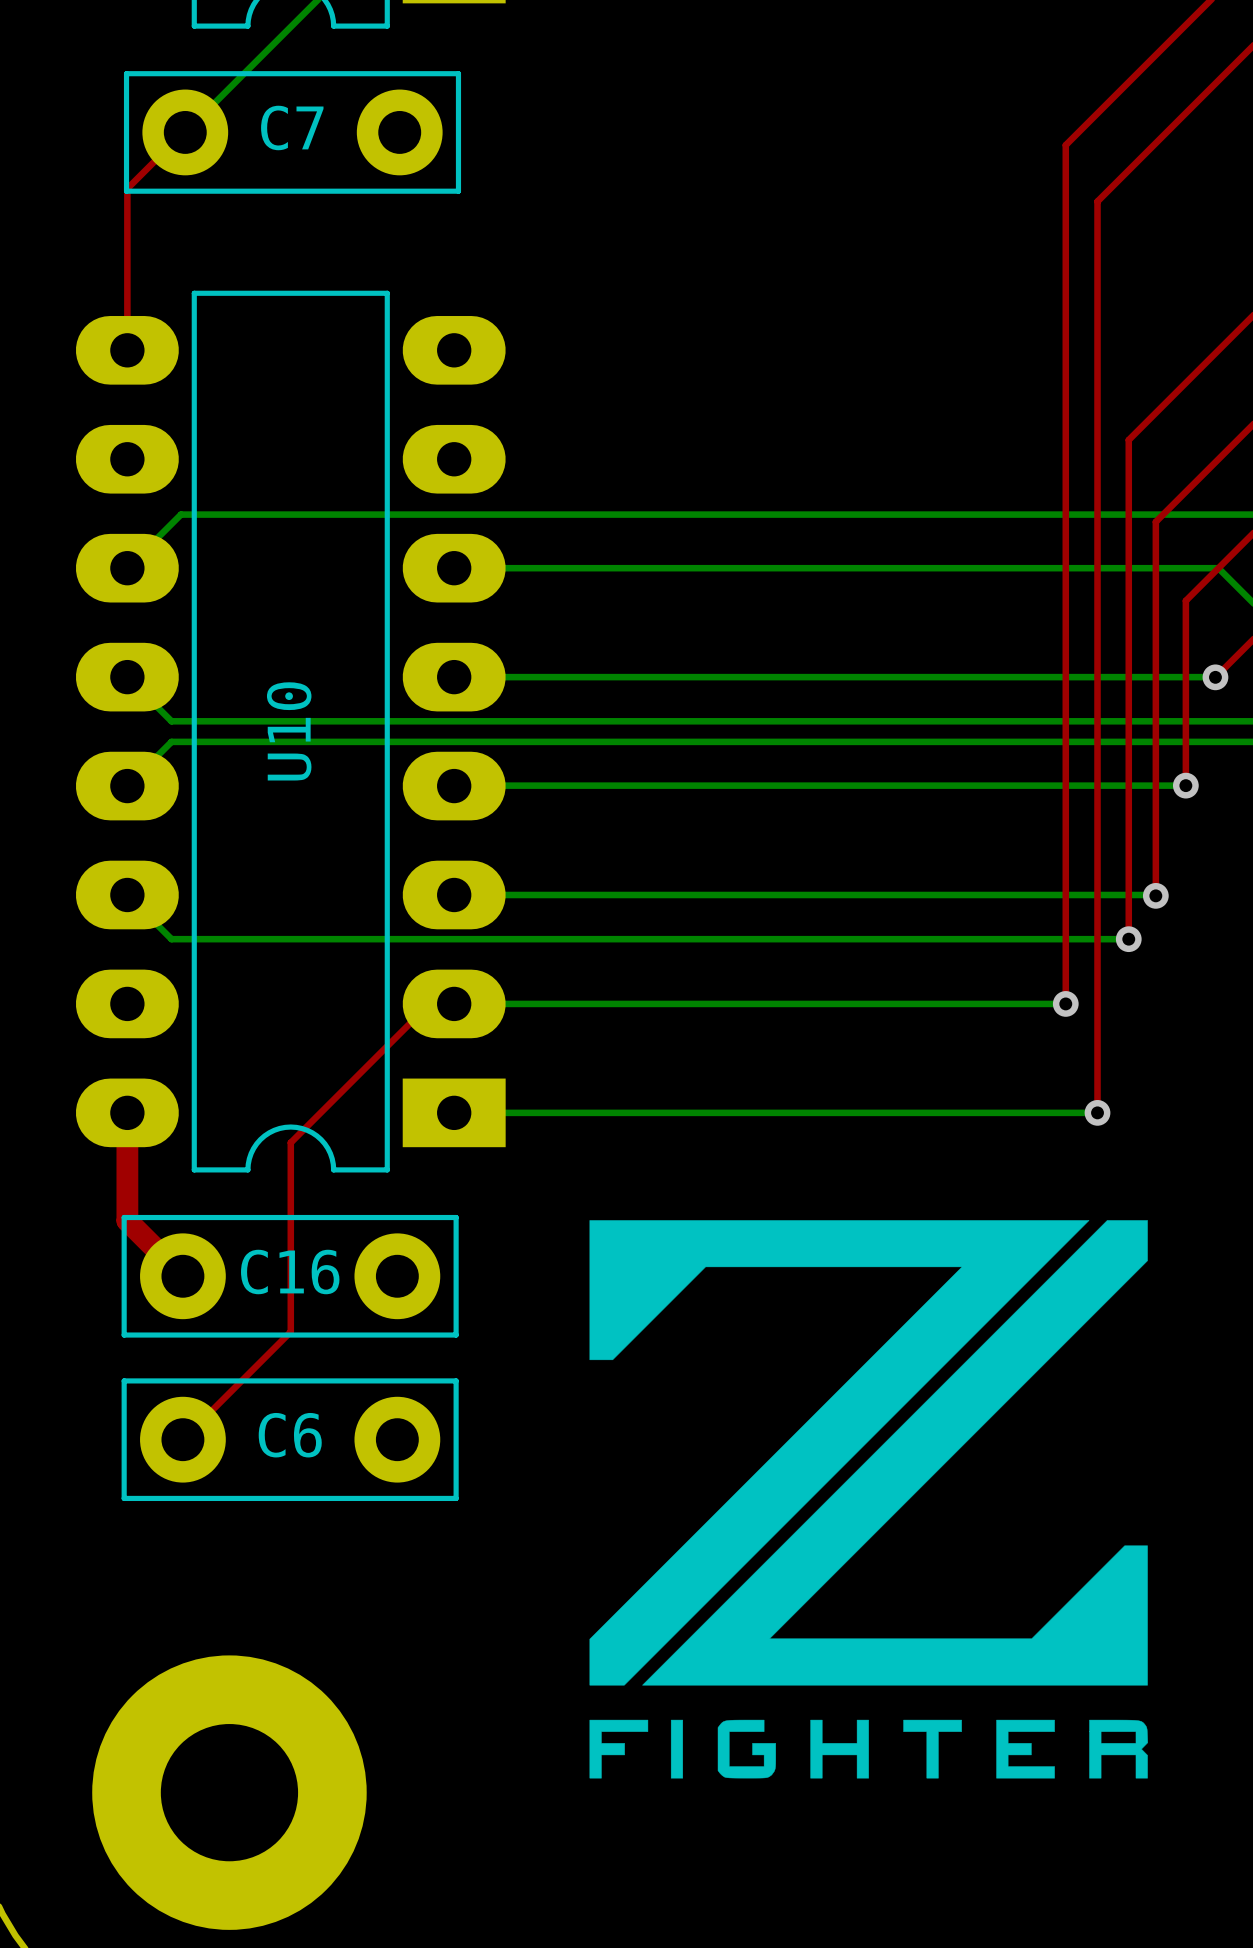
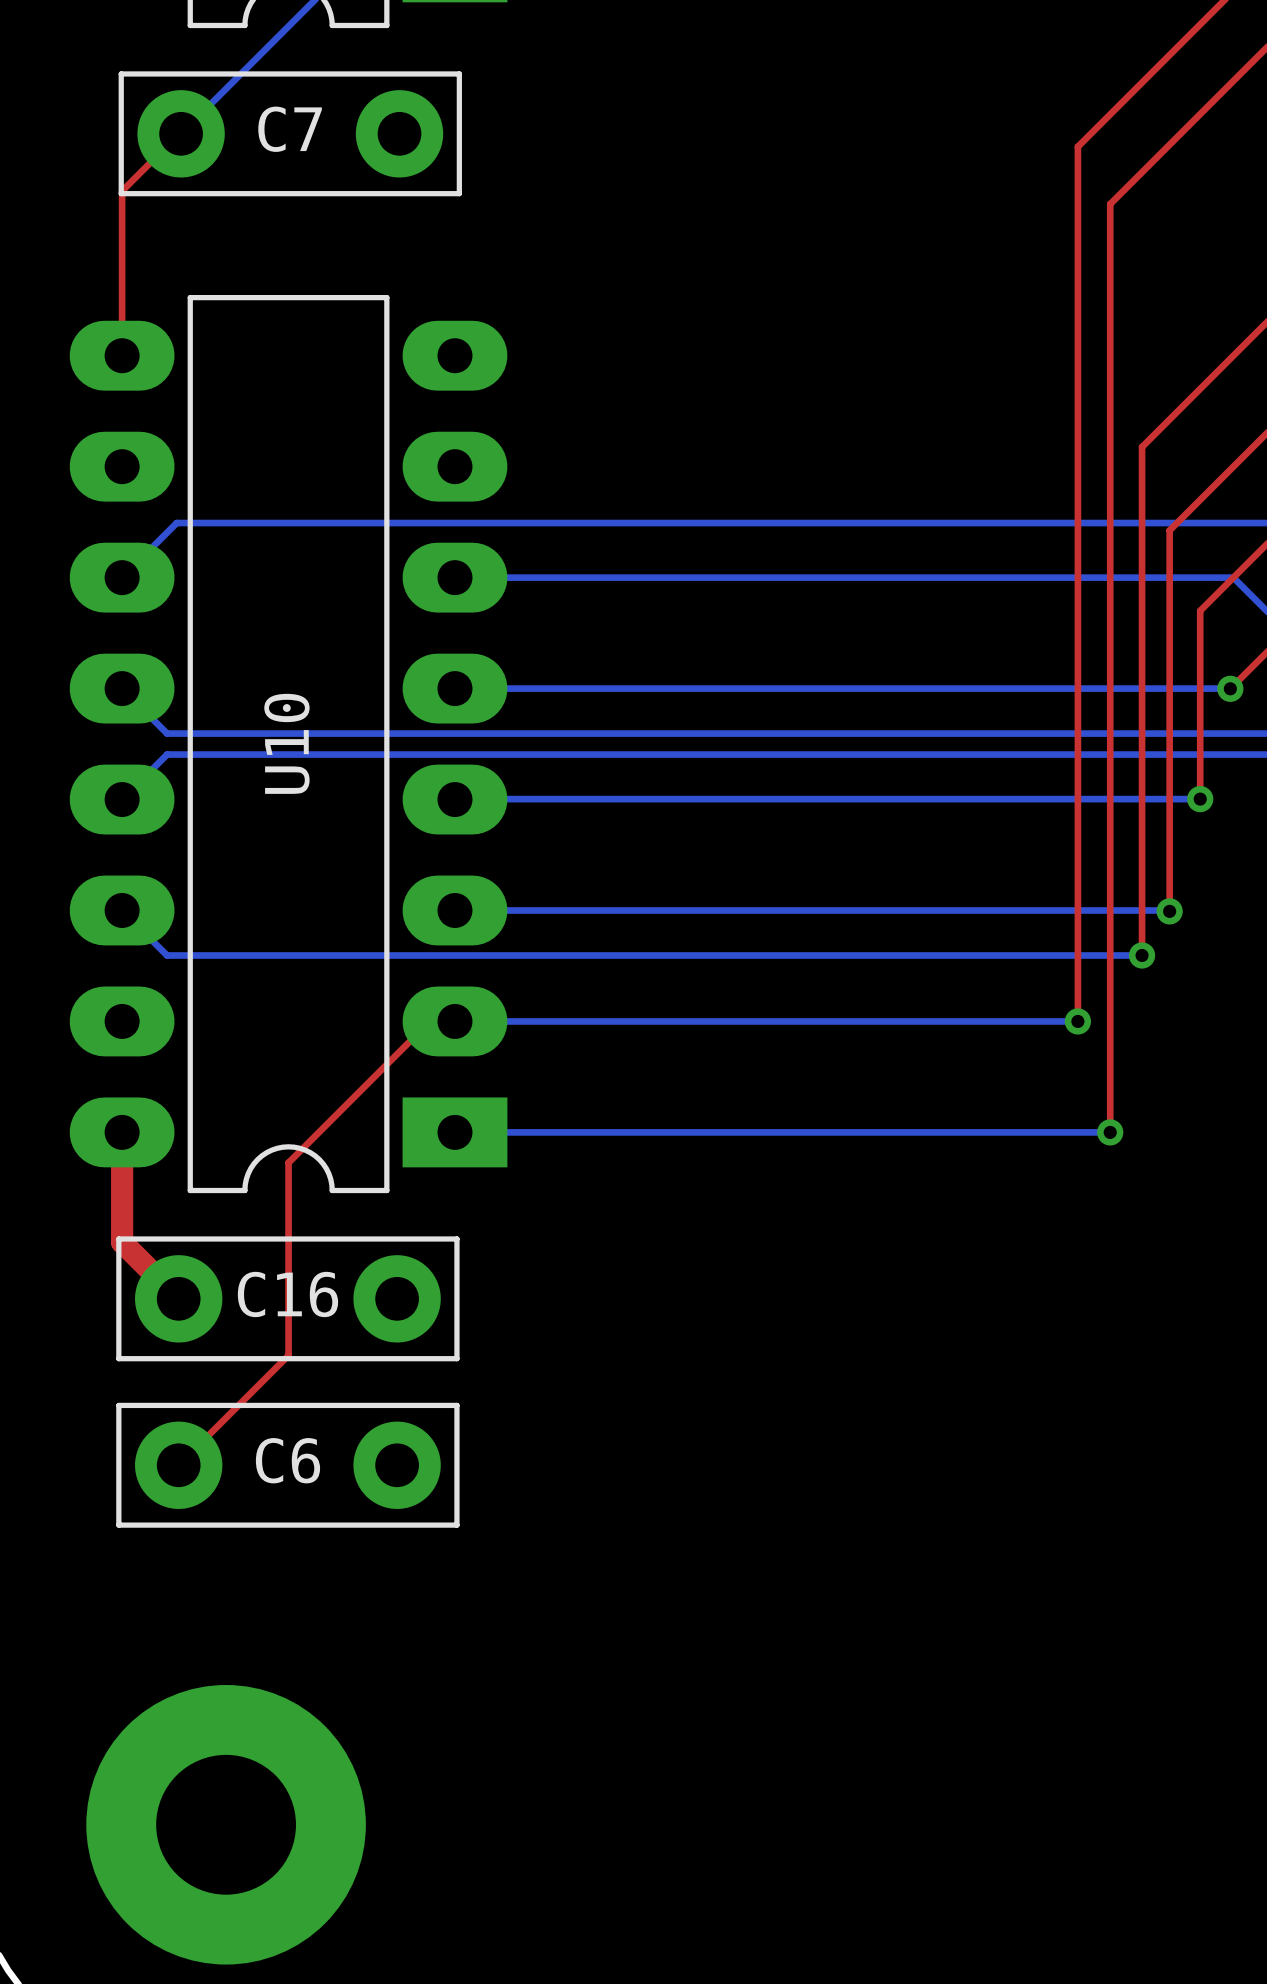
drawing: [589, 1220, 1148, 1779] -> none

